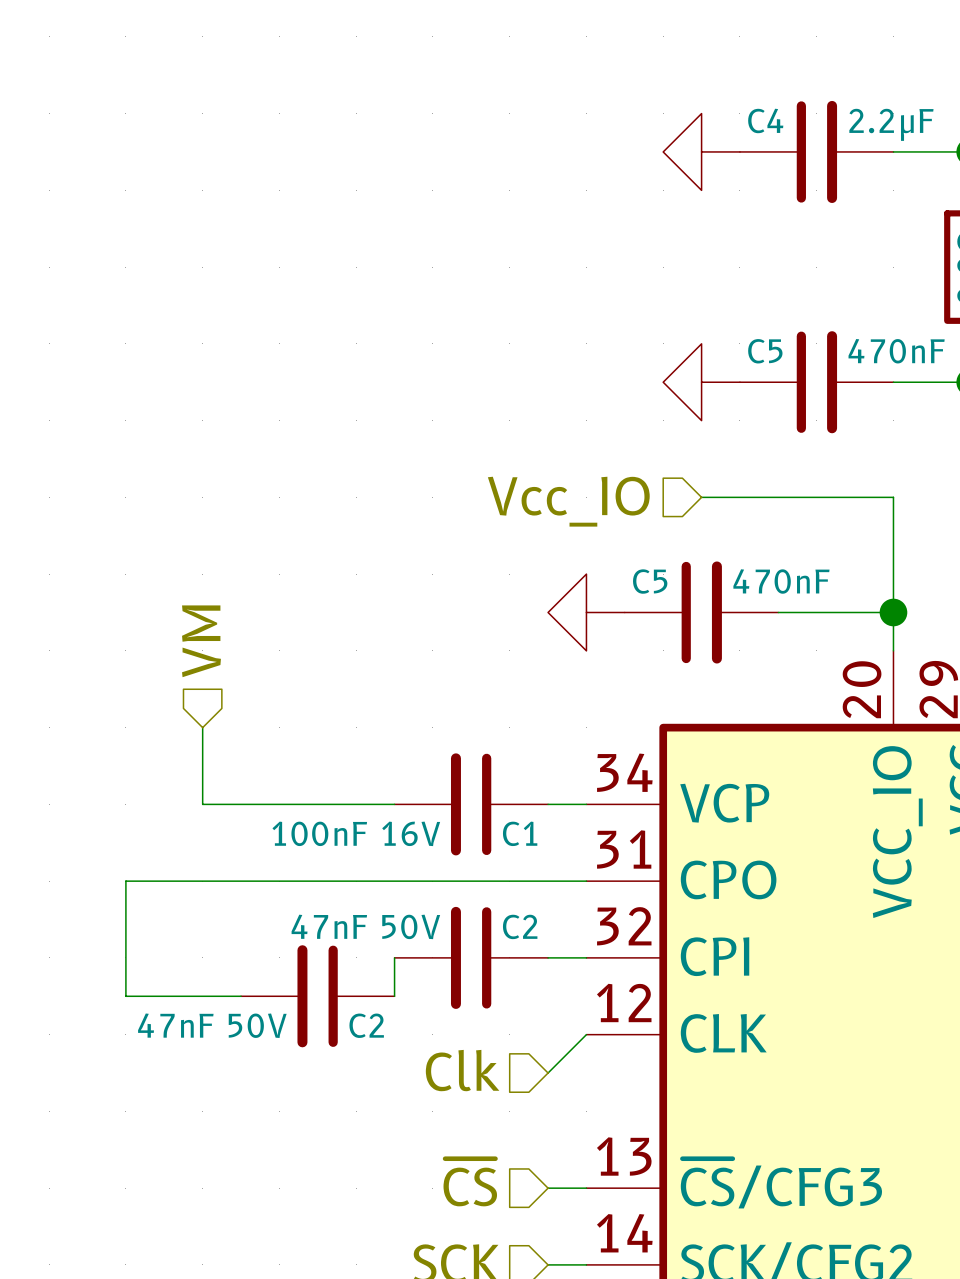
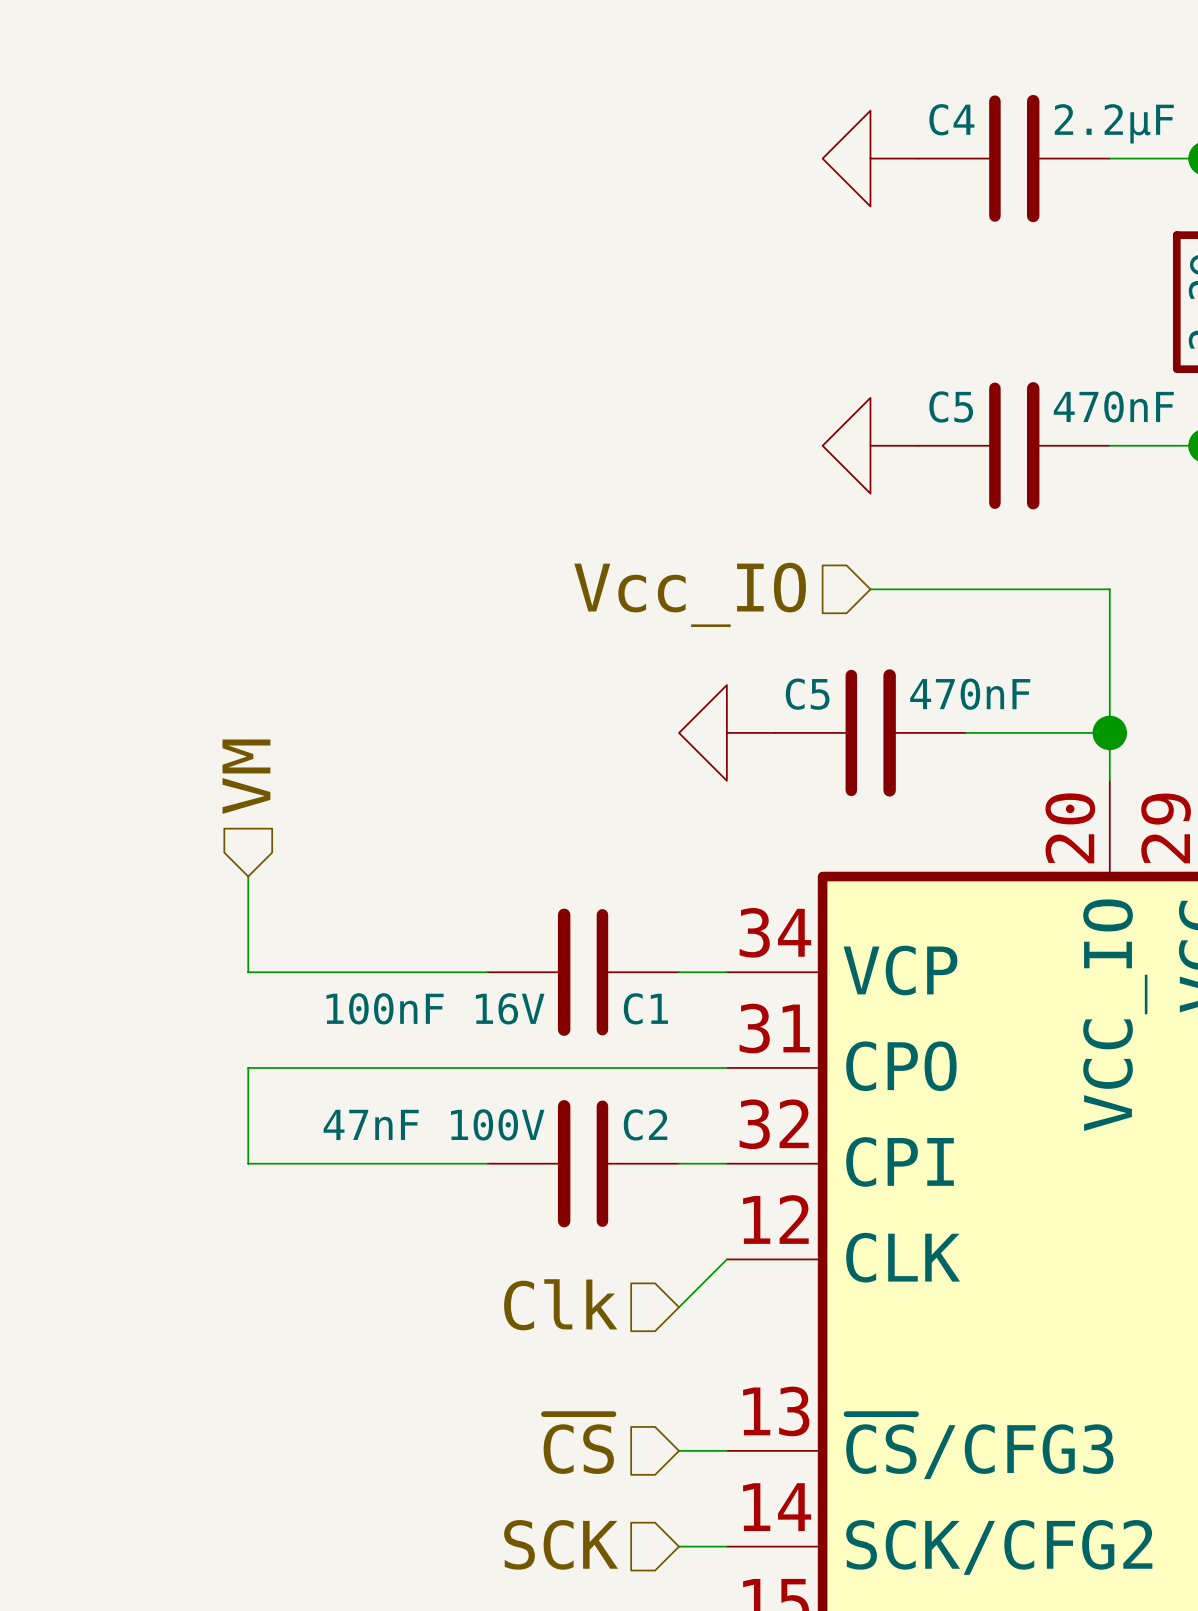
wire: (202, 881) (125, 881) (125, 996) (241, 996) -> (248, 1067) (248, 1163) (487, 1163)
C2 value: 47nF 50V (365, 926) -> 47nF 100V (434, 1124)
wire: (394, 957) (394, 996) -> none
C2: 47nF 50V (317, 996) -> none

